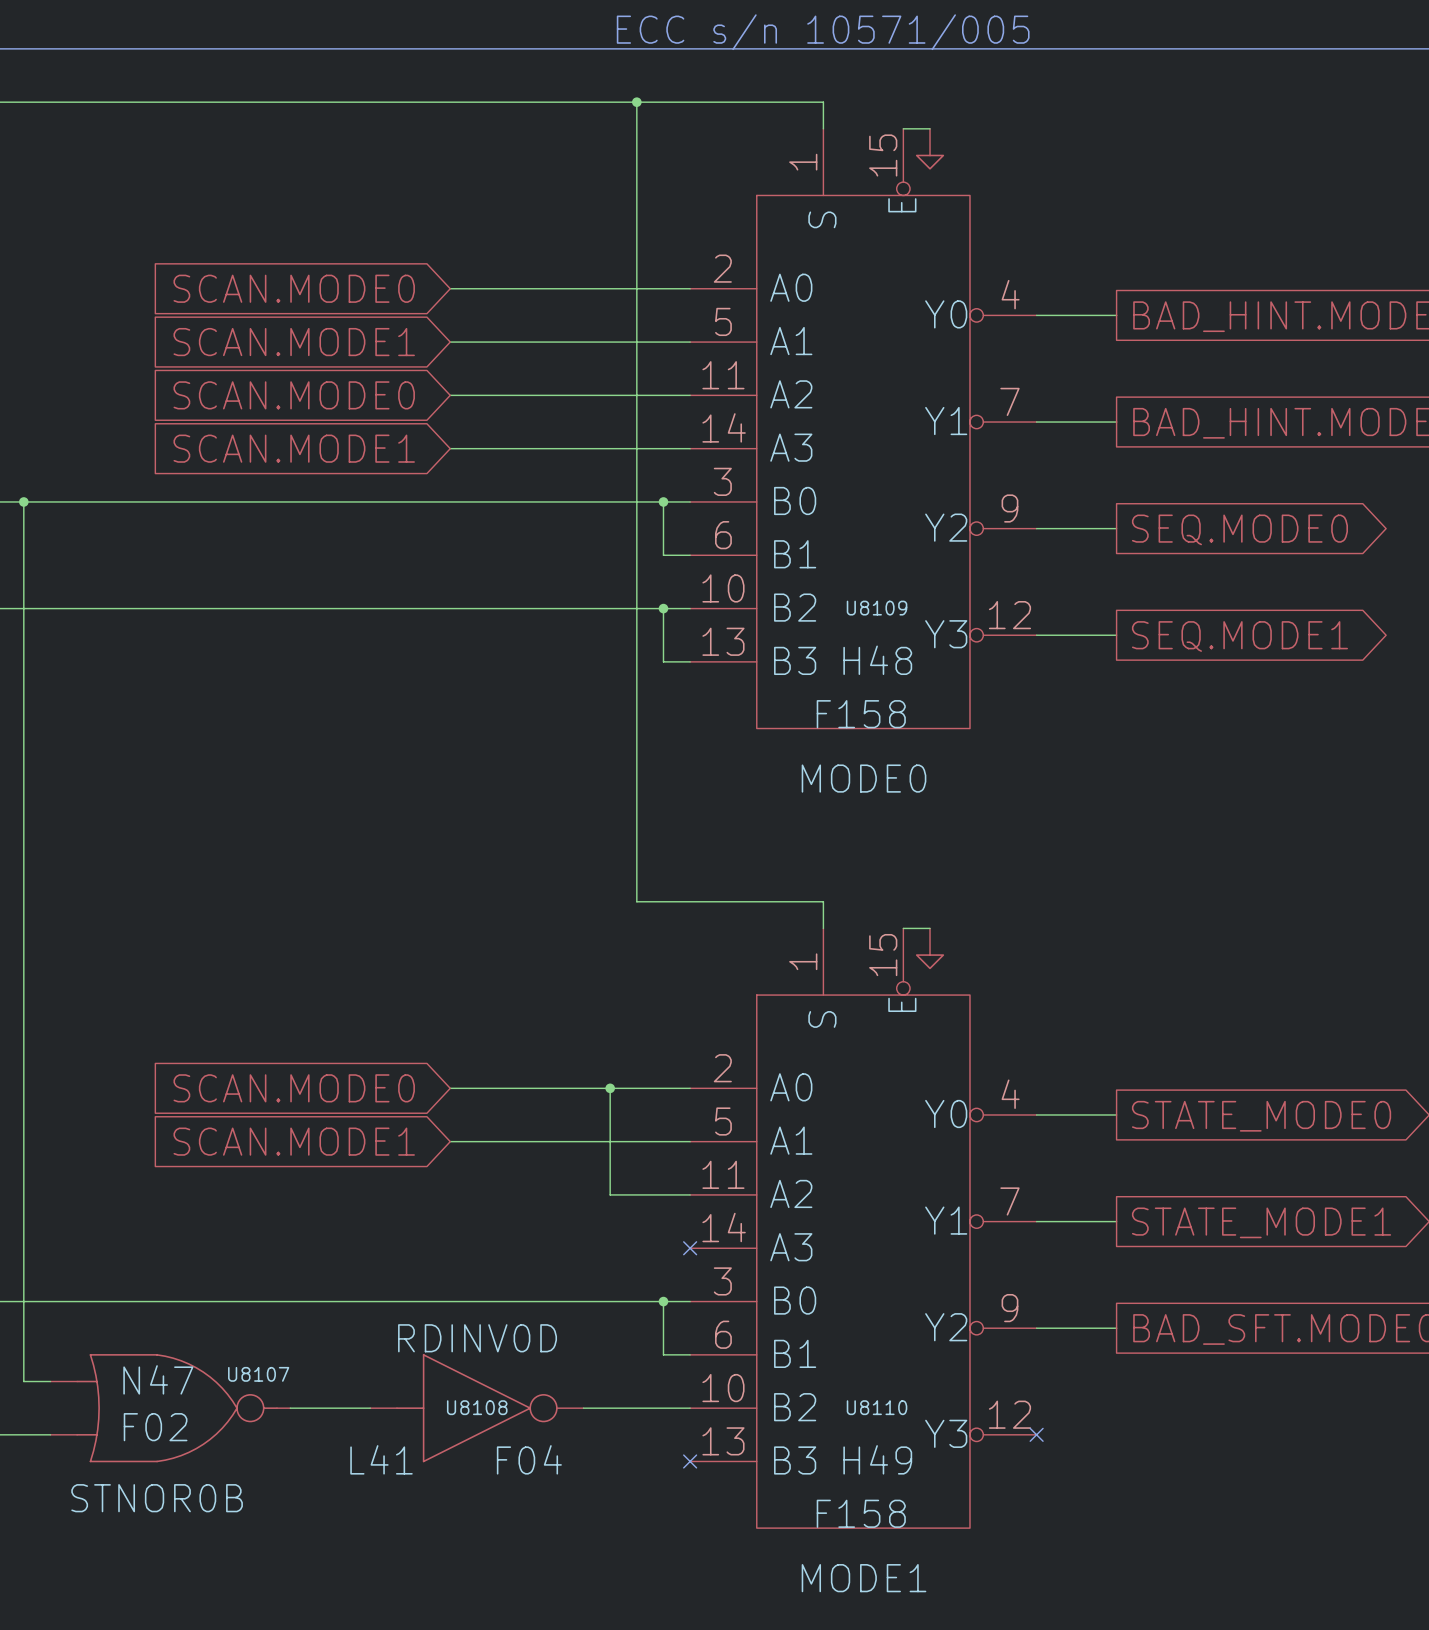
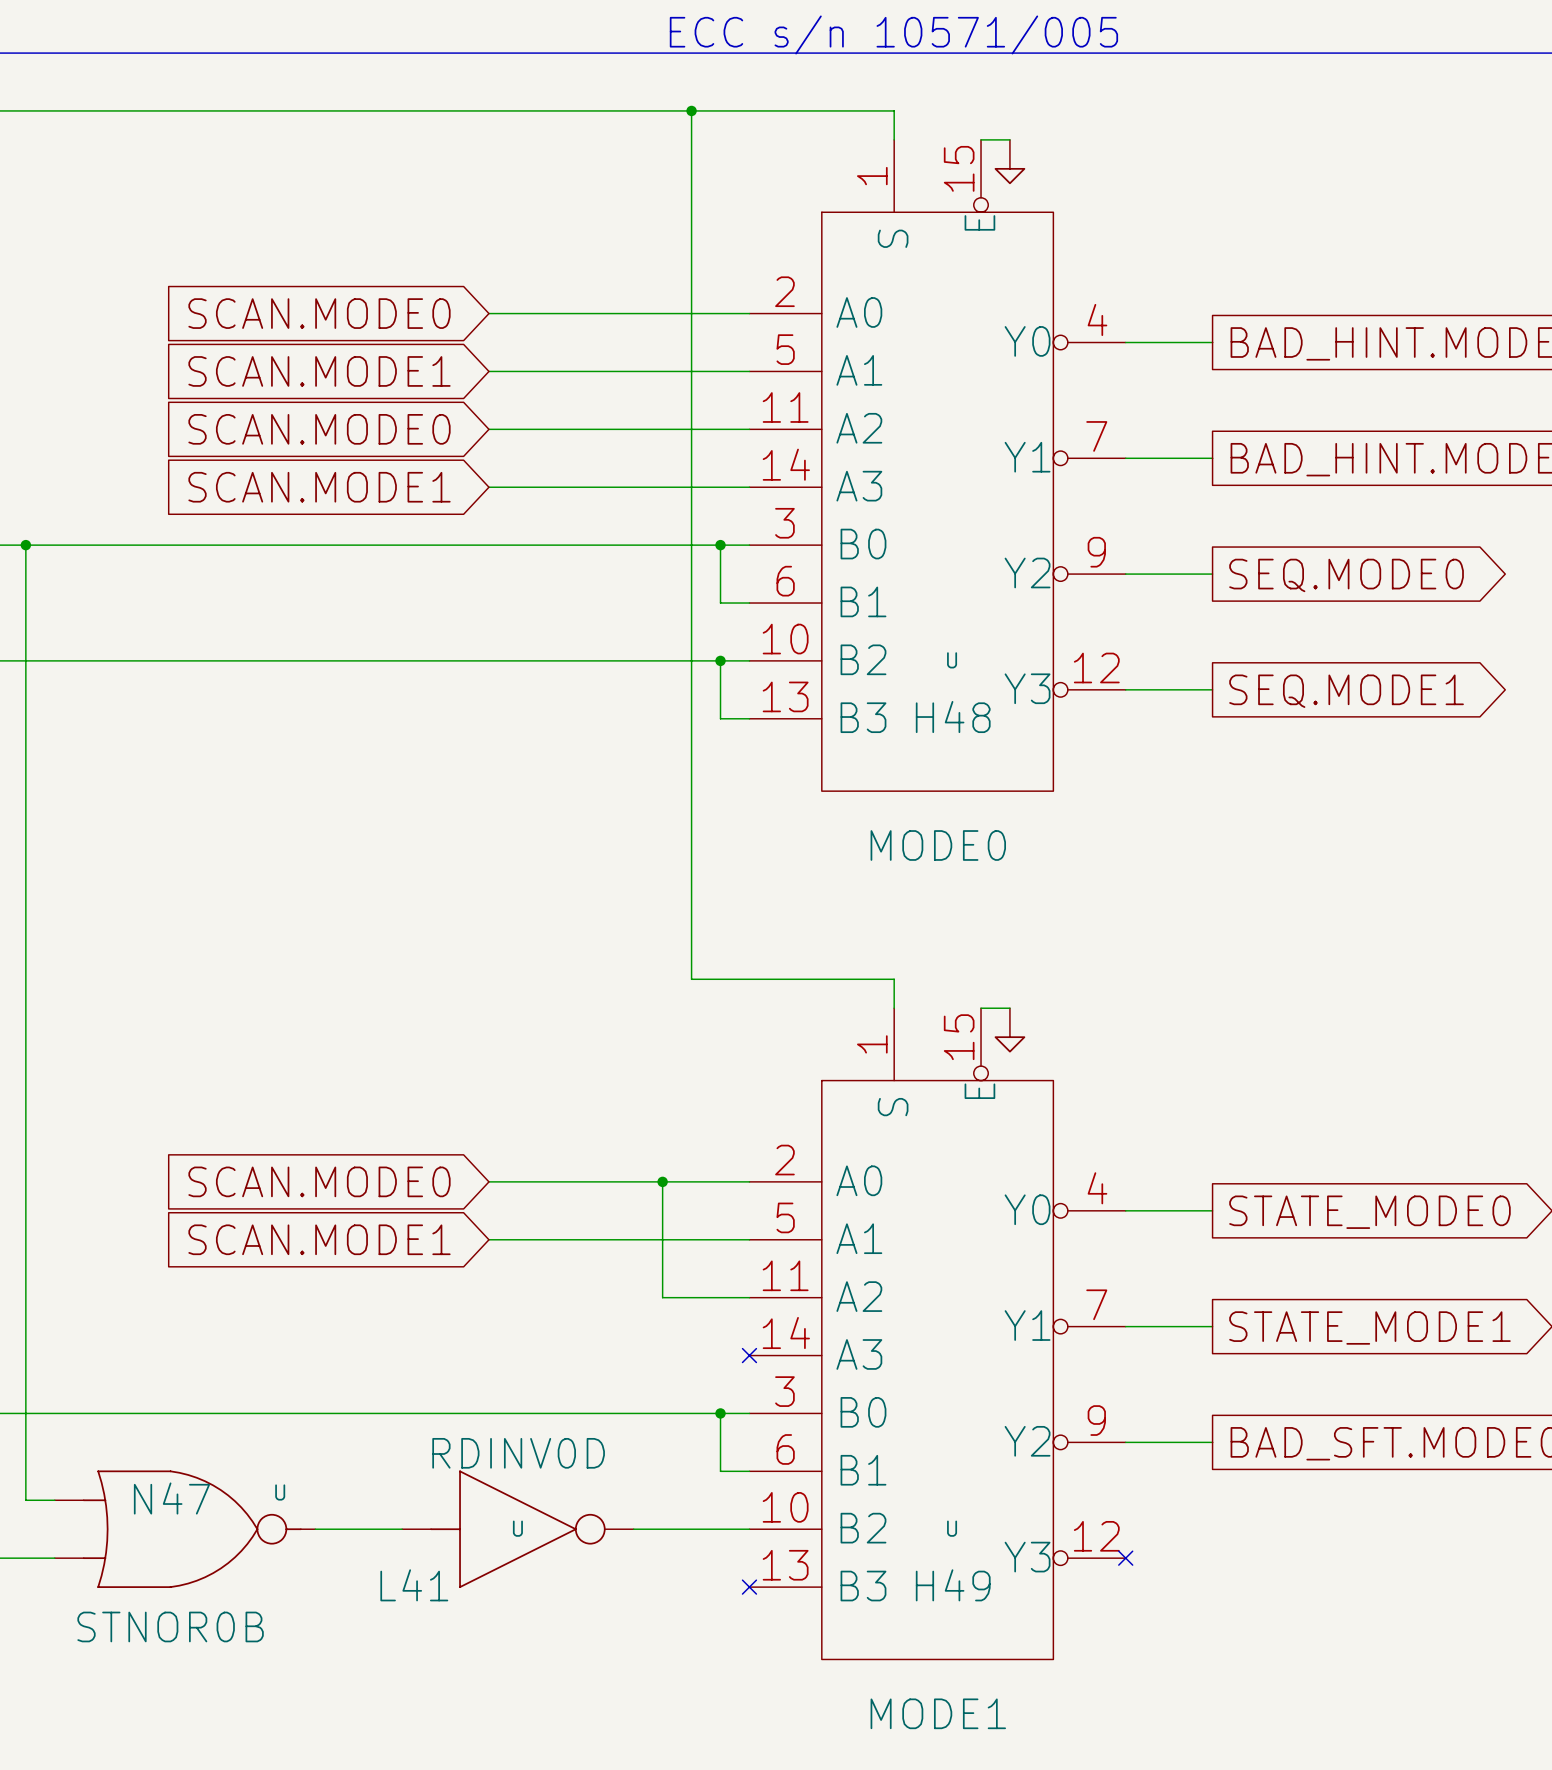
U8109 name: U8109 (877, 608) -> U (952, 660)
U8109 value: F158 (861, 714) -> none
U8107 name: U8107 (258, 1374) -> U (280, 1492)
U8108 name: U8108 (477, 1407) -> U (517, 1528)
U8110 name: U8110 (877, 1407) -> U (952, 1528)
U8107 value: F02 (155, 1427) -> none
U8108 value: F04 (529, 1459) -> none
U8110 value: F158 (861, 1513) -> none

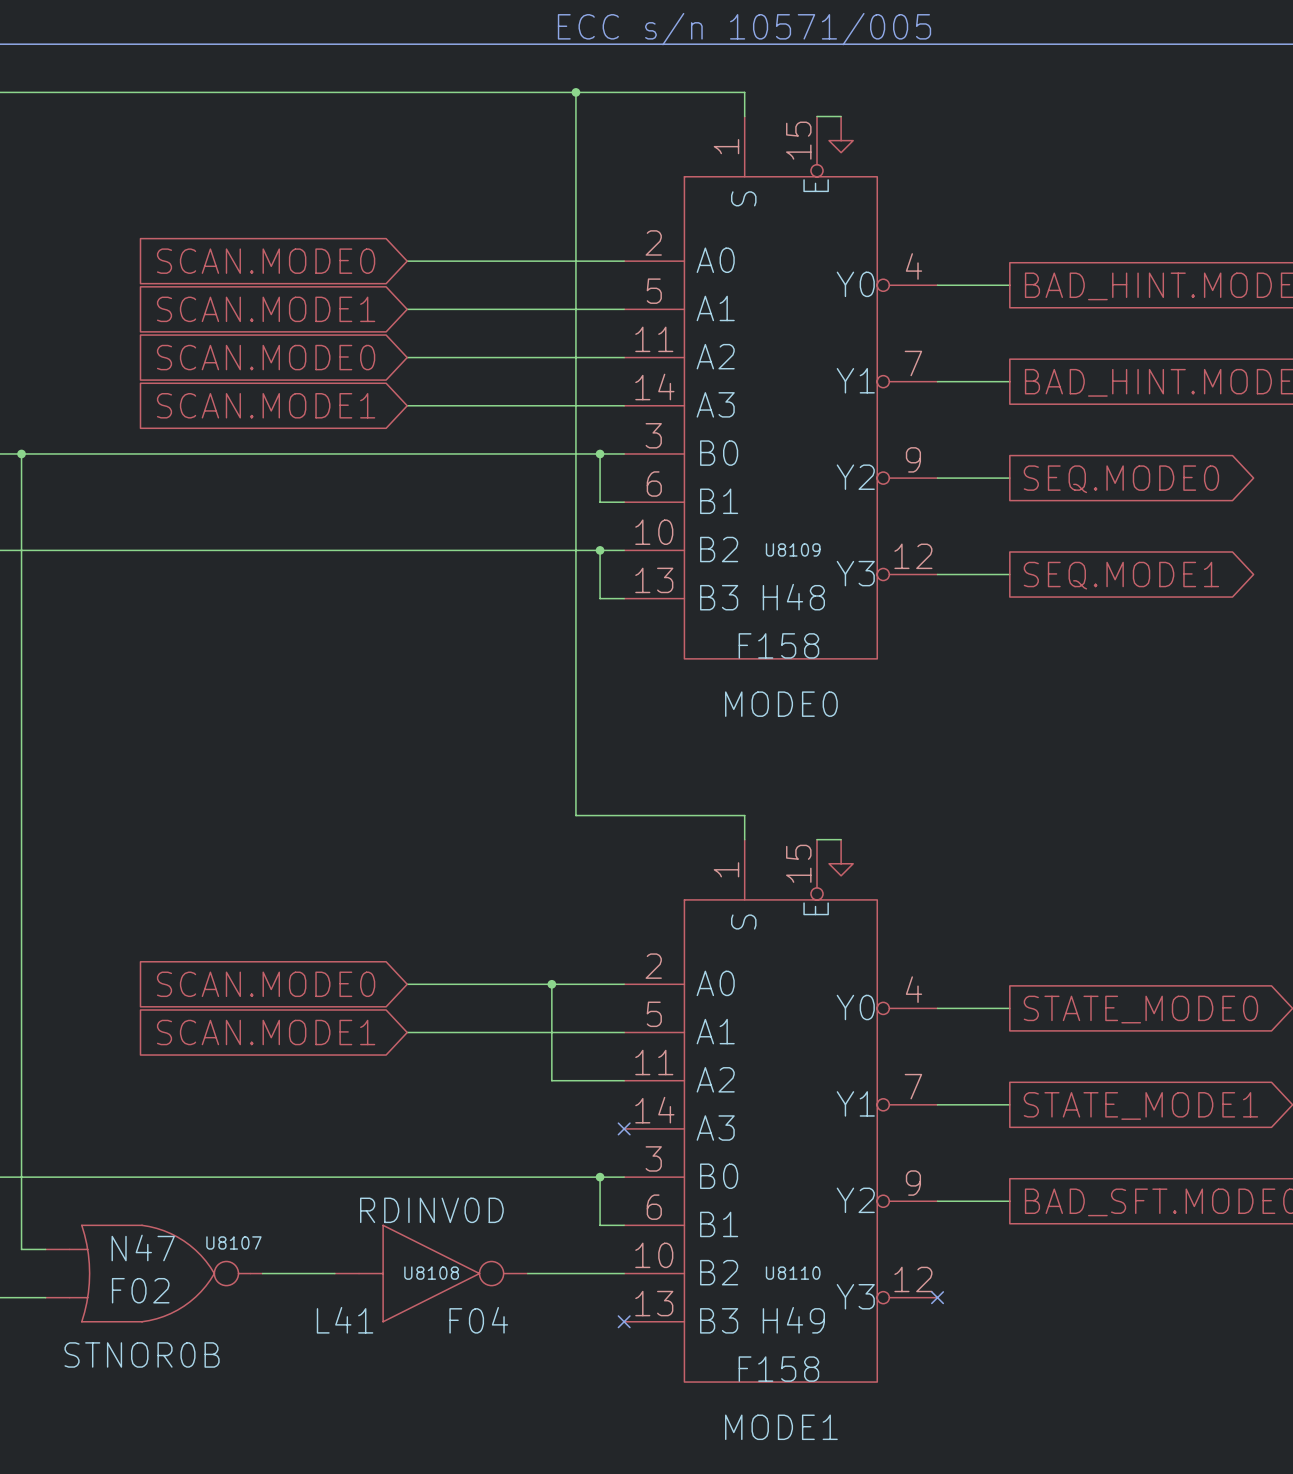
U name: U (952, 660) -> U8109 (793, 549)
U value: none -> F158 (778, 645)
U name: U (280, 1492) -> U8107 (233, 1242)
U name: U (517, 1528) -> U8108 (431, 1273)
U name: U (952, 1528) -> U8110 (793, 1273)
U value: none -> F02 (140, 1290)
U value: none -> F04 (478, 1320)
U value: none -> F158 (778, 1369)

